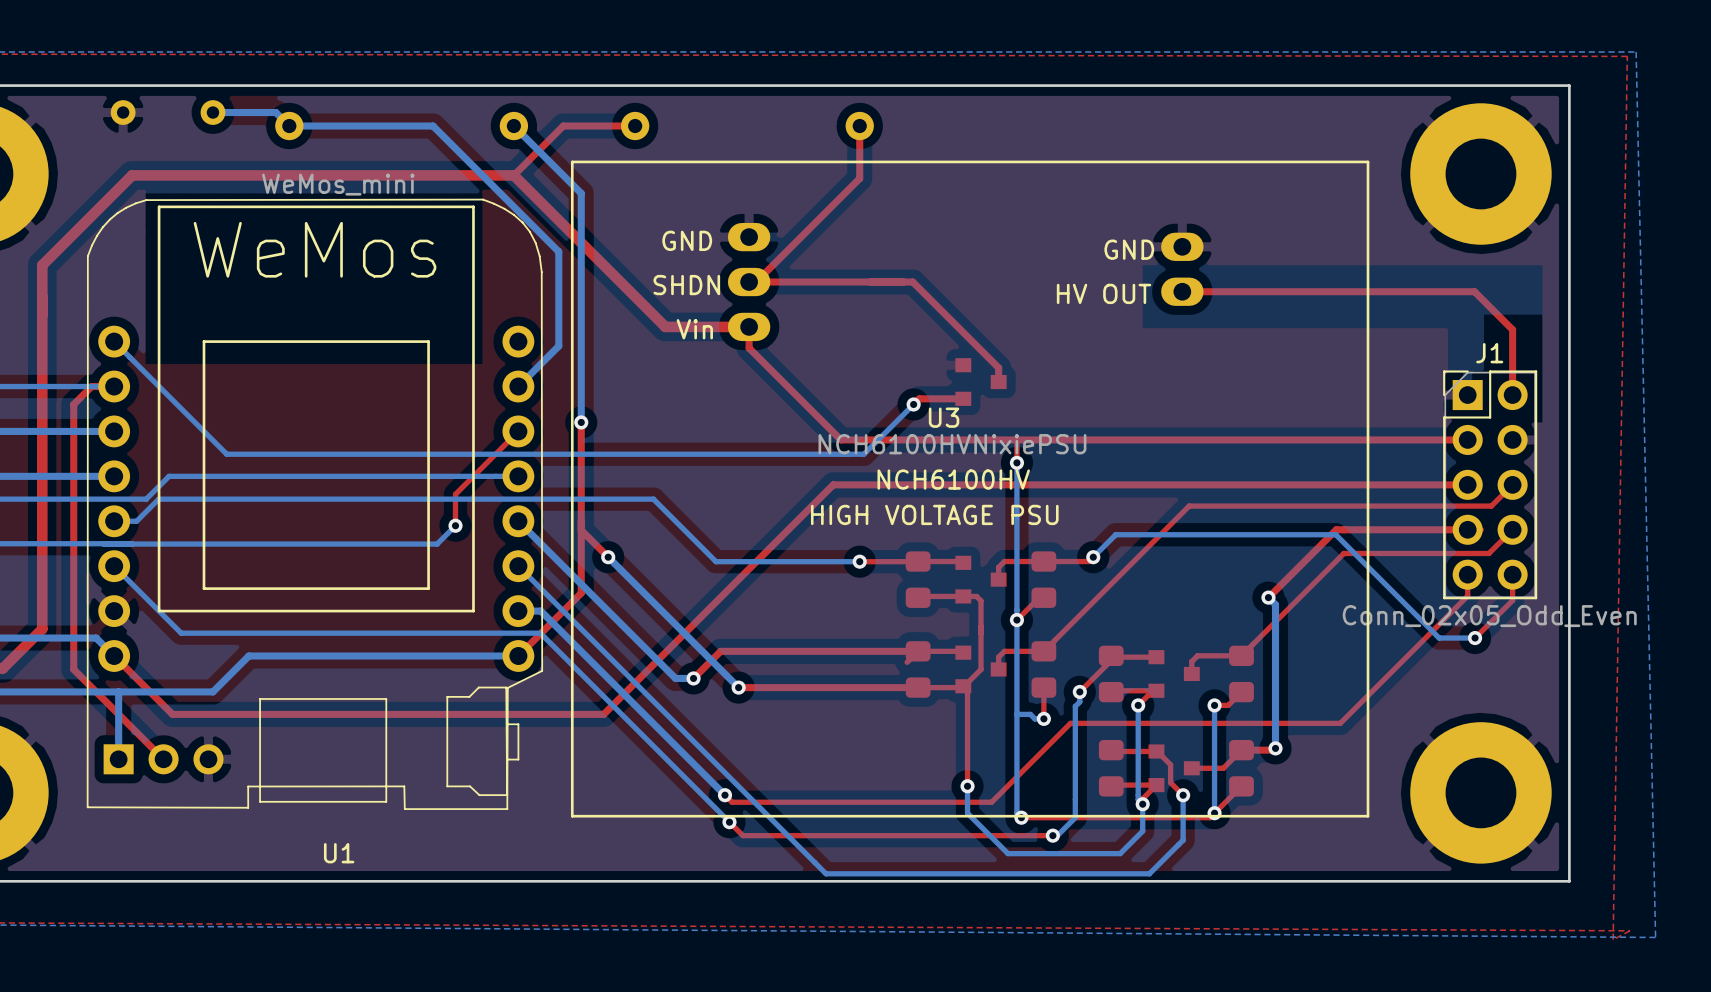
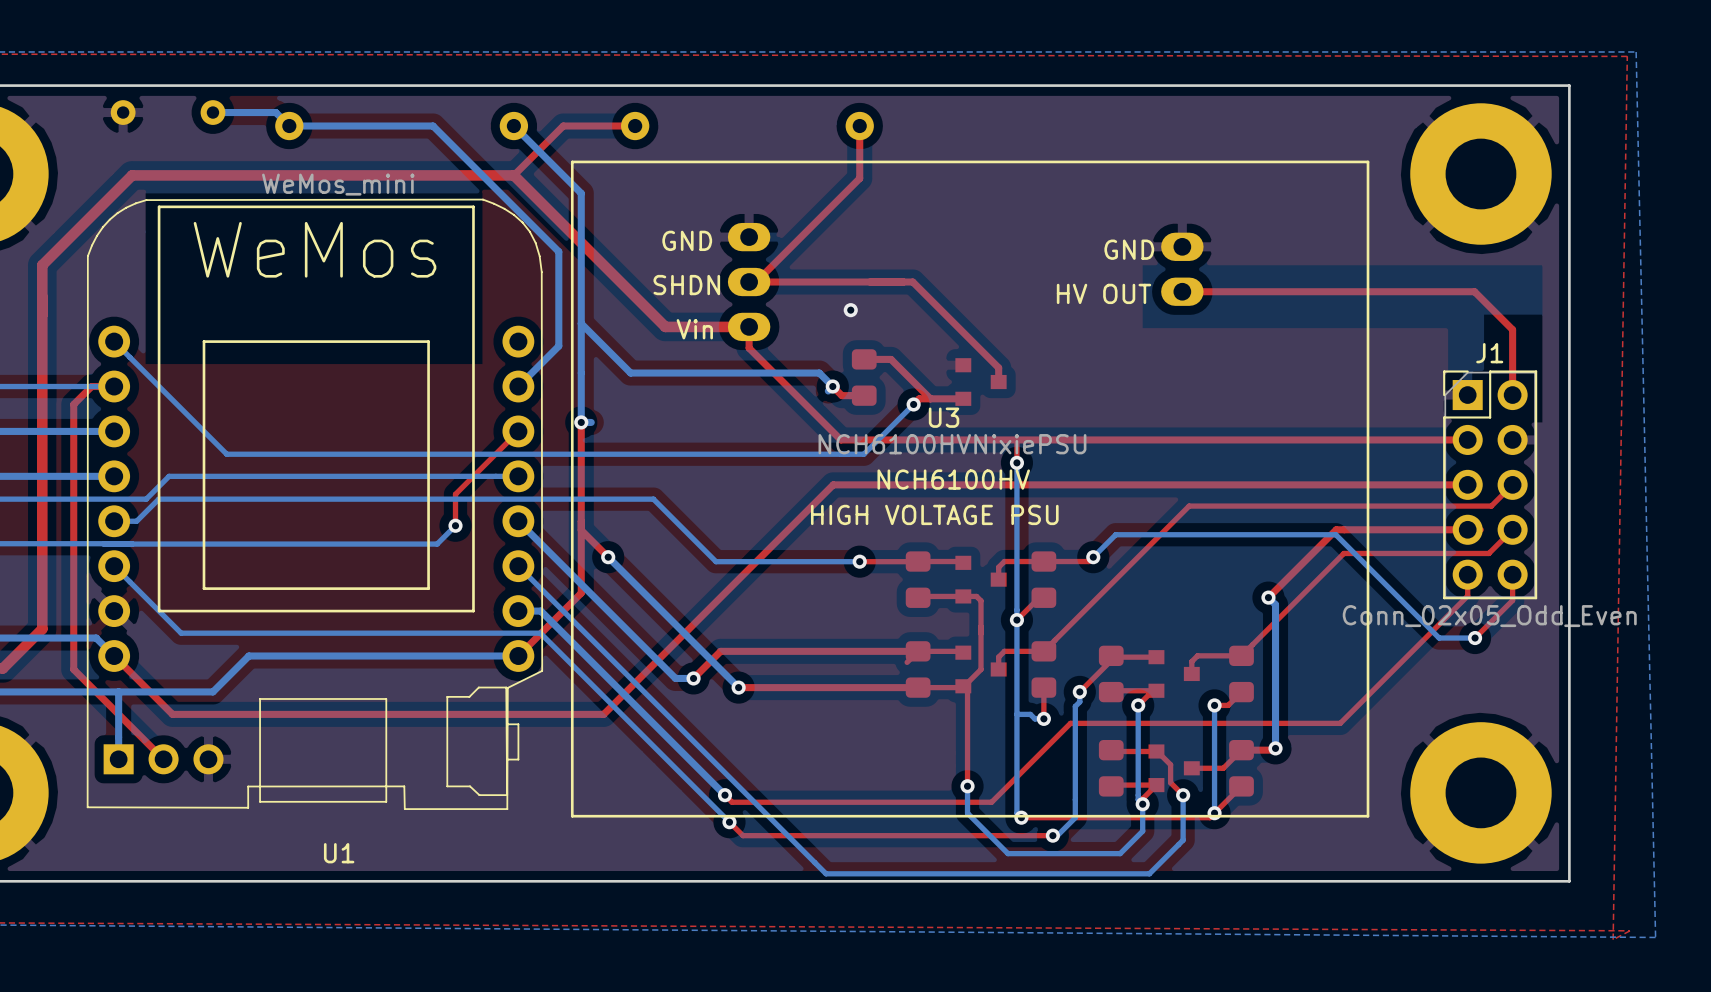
via: none -> (850, 310)
bottom track: none -> (581, 323) (630, 373) (819, 373) (832, 386) (828, 391)
top track: none -> (864, 359) (891, 359) (930, 398)
part: none -> (864, 377)
top track: none -> (832, 386) (841, 395) (864, 395)
via: none -> (832, 386)
bottom track: none -> (591, 422) (581, 422)

